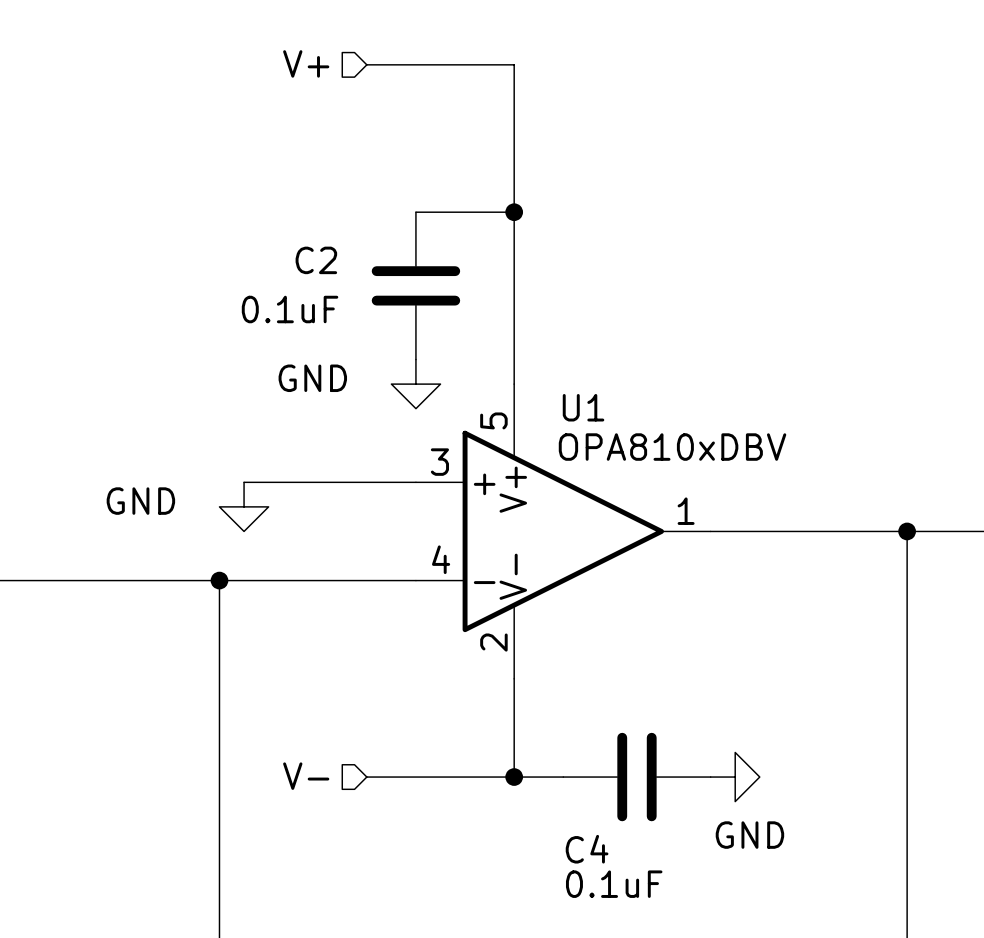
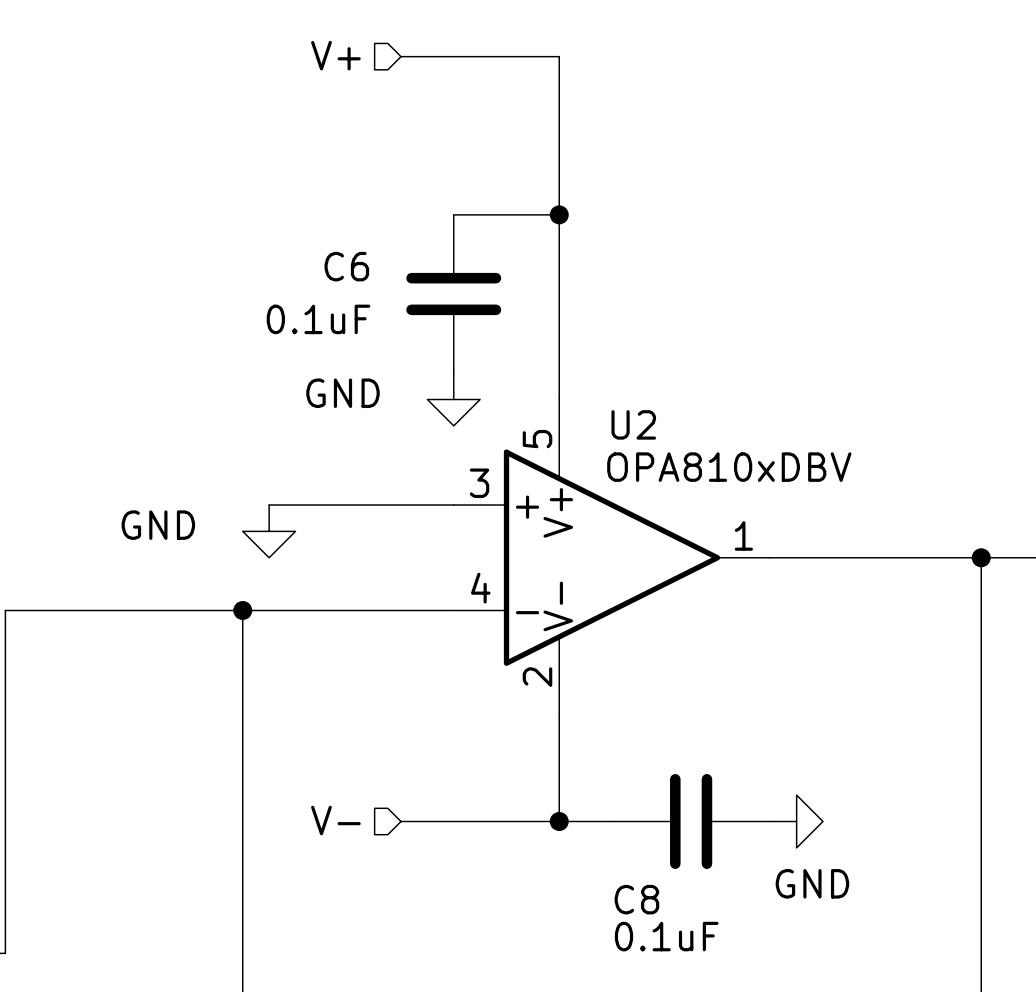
C2 name: C2 (316, 260) -> C6 (346, 266)
U1 name: U1 (583, 407) -> U2 (633, 424)
C4 name: C4 (587, 849) -> C8 (636, 899)

